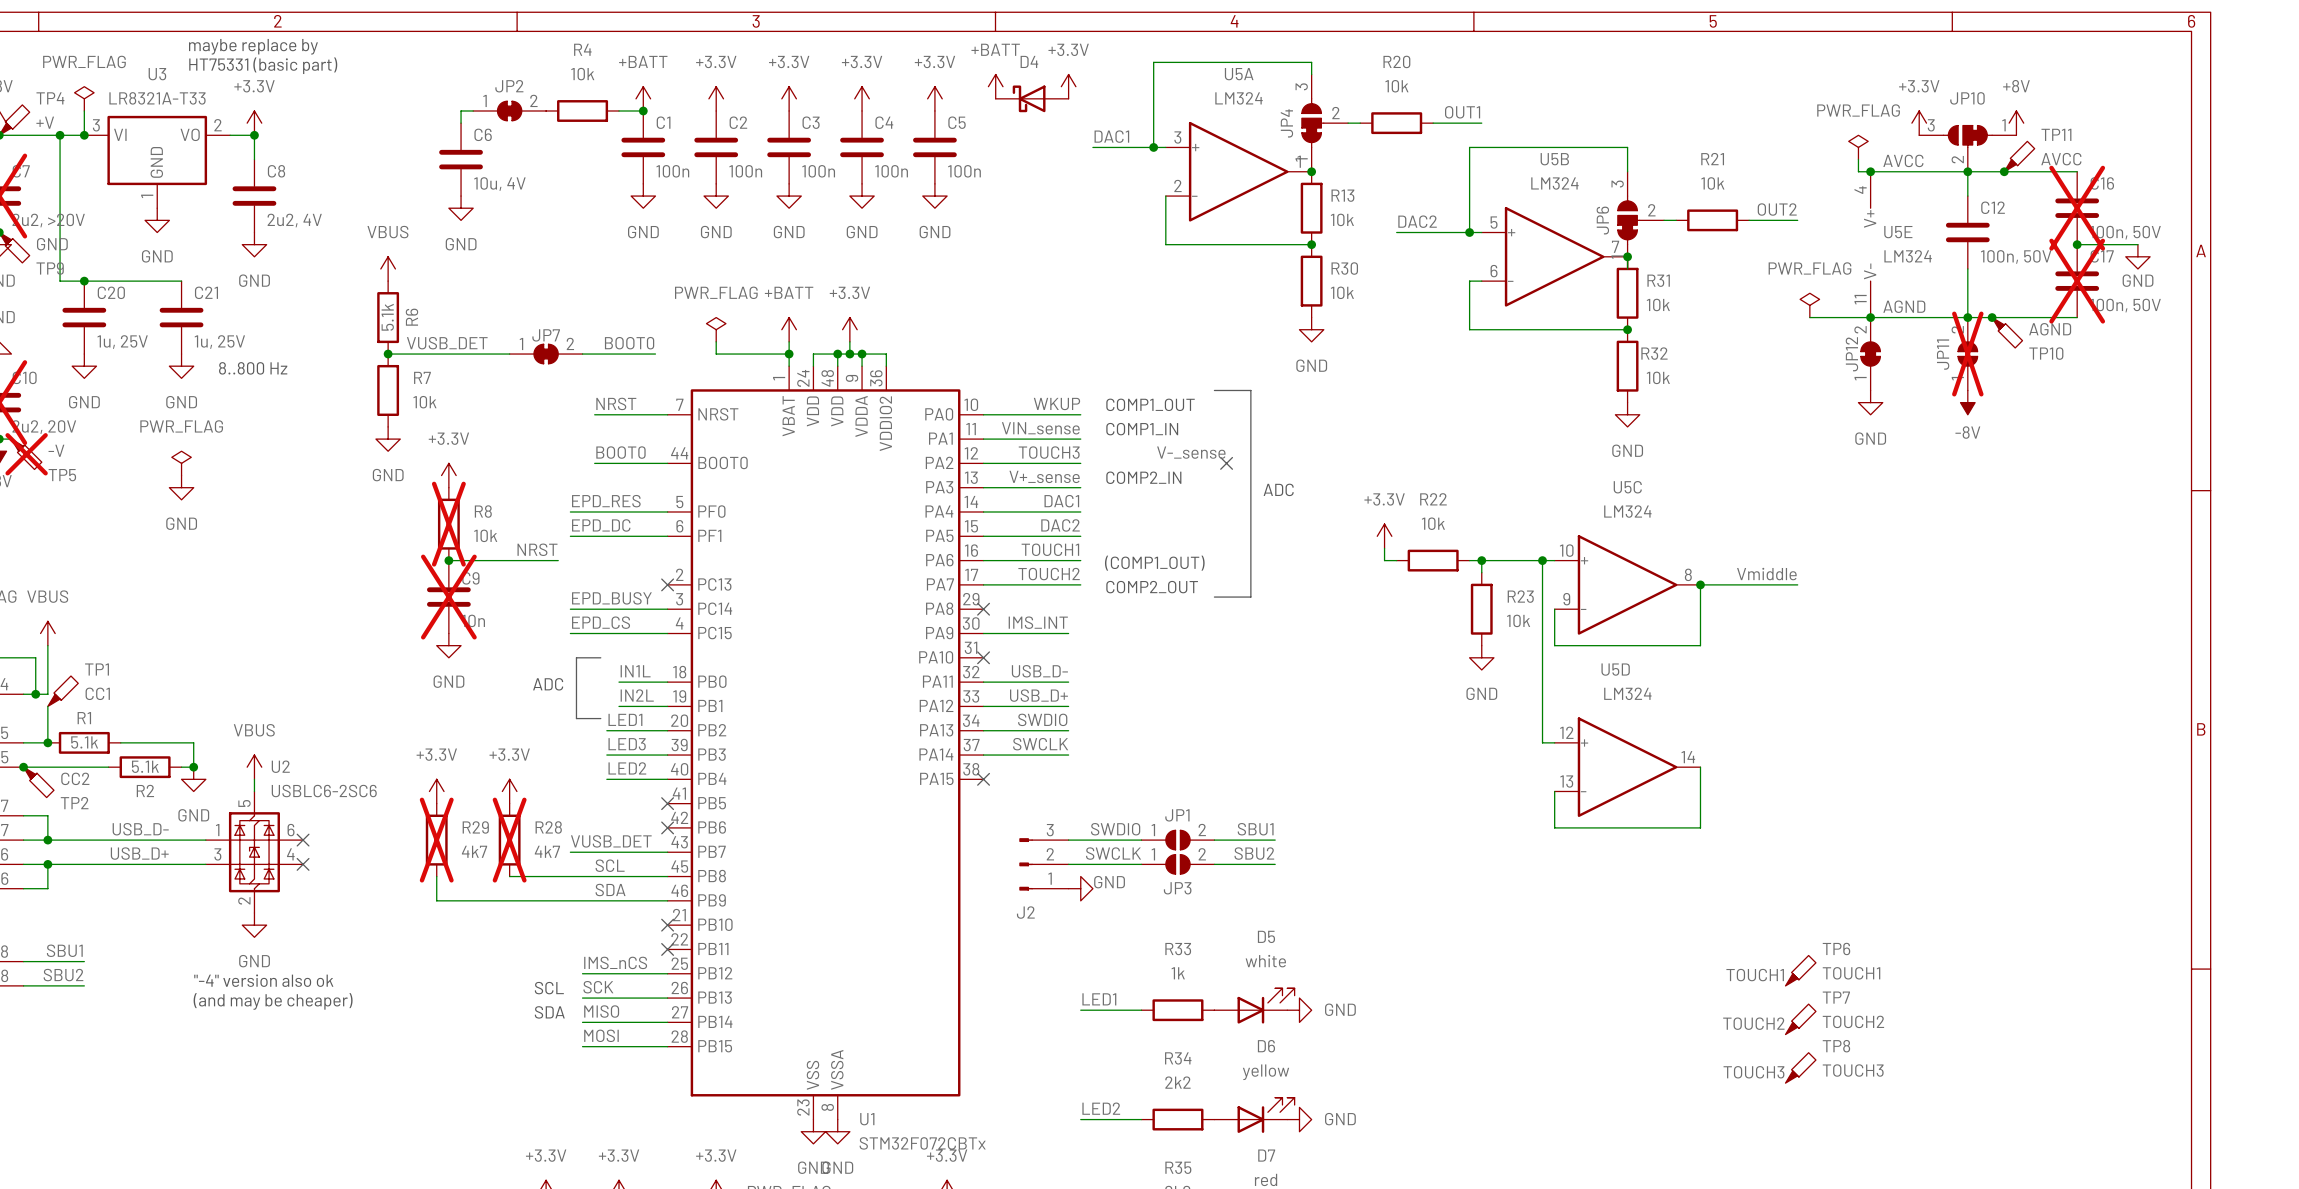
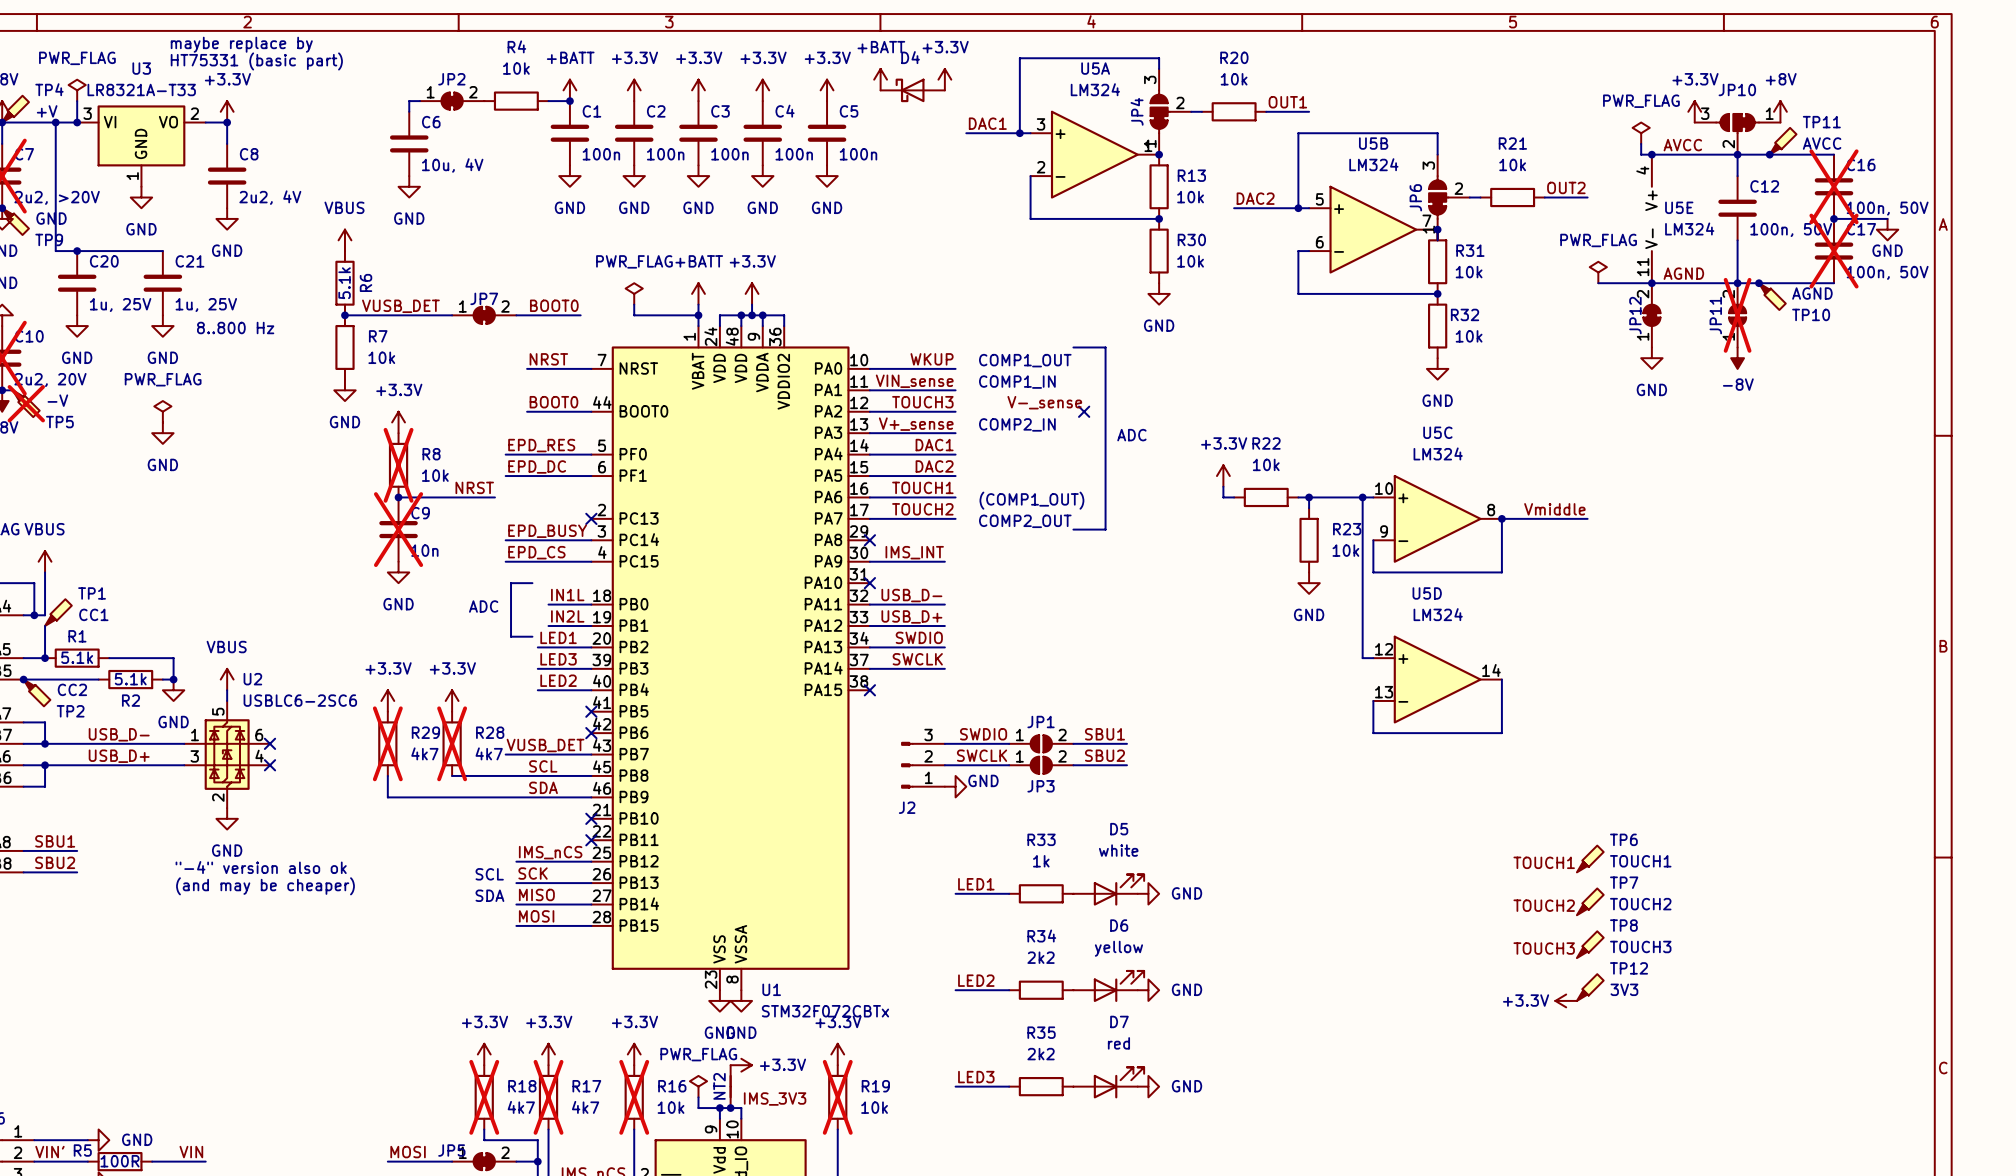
TP12: none -> 3V3 (1590, 987)
power symbol: none -> +3.3V (1566, 1000)

